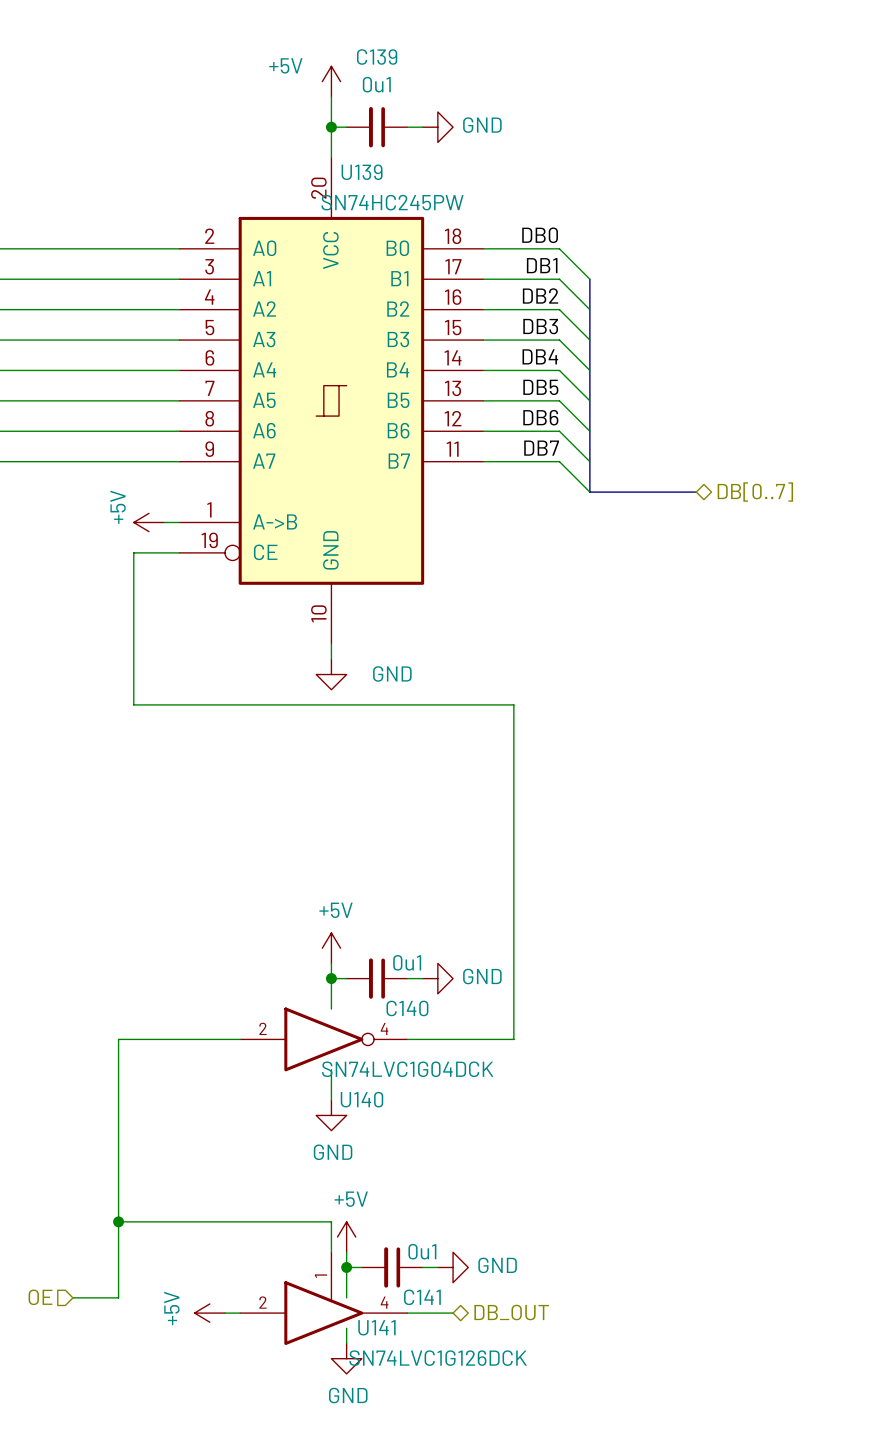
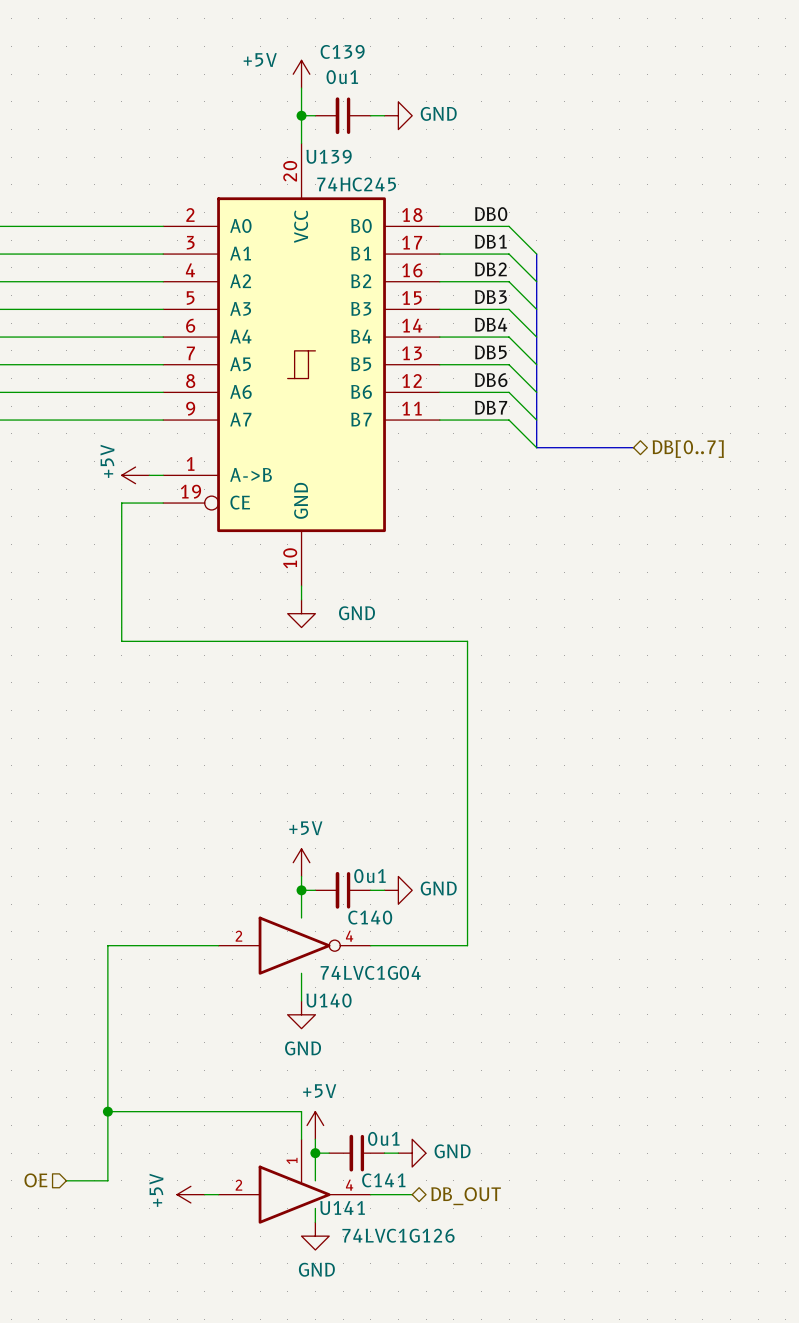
U139 value: SN74HC245PW (392, 202) -> 74HC245 (356, 184)
U140 value: SN74LVC1G04DCK (407, 1069) -> 74LVC1G04 (370, 972)
U141 value: SN74LVC1G126DCK (438, 1358) -> 74LVC1G126 (398, 1235)

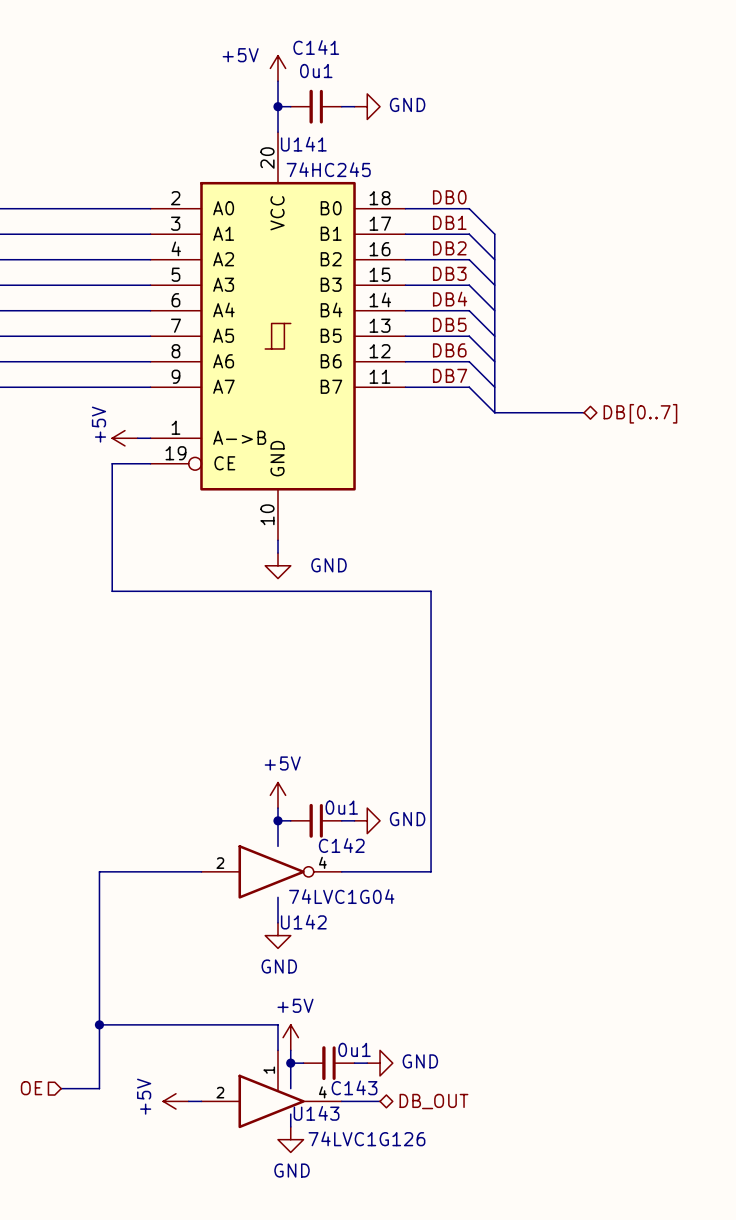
C139 name: C139 (342, 51) -> C141 (316, 47)
U139 name: U139 (329, 156) -> U141 (303, 144)
C140 name: C140 (370, 917) -> C142 (341, 845)
U140 name: U140 (329, 1000) -> U142 (303, 922)
C141 name: C141 (383, 1180) -> C143 (354, 1087)
U141 name: U141 (342, 1208) -> U143 (316, 1113)

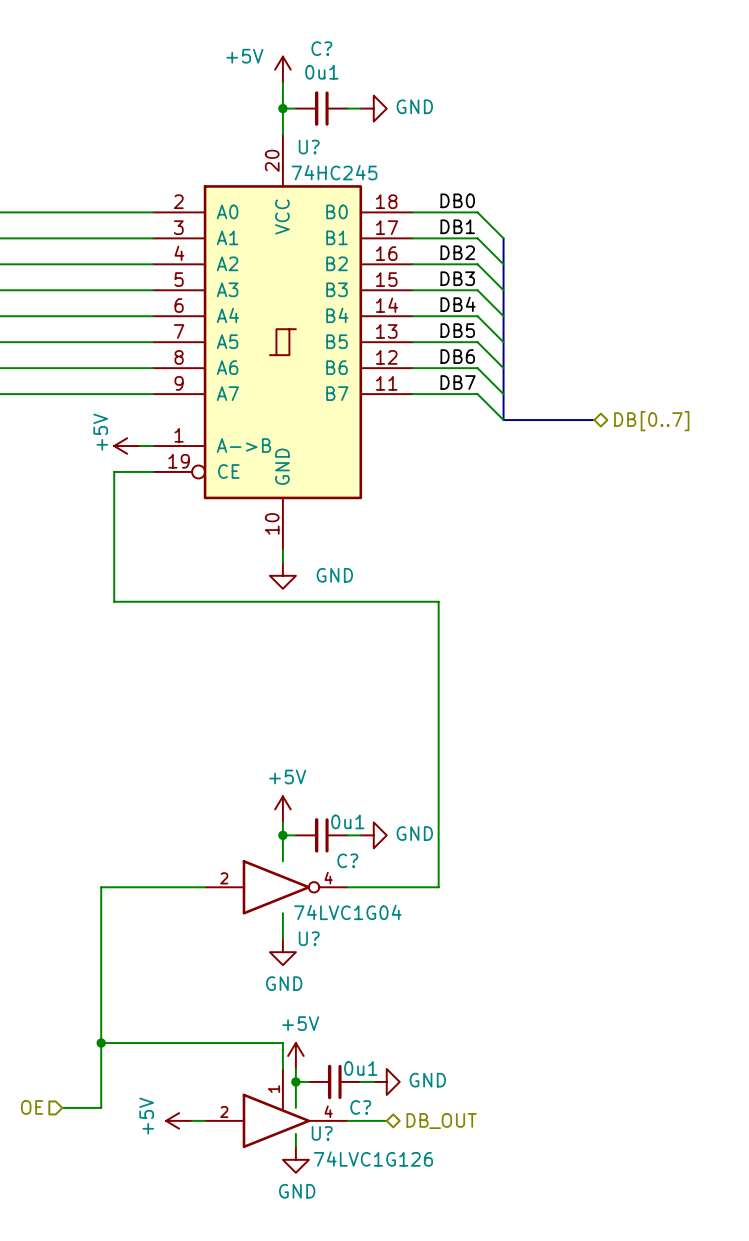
C141 name: C141 (316, 47) -> C? (321, 48)
U141 name: U141 (303, 144) -> U? (309, 147)
C142 name: C142 (341, 845) -> C? (347, 860)
U142 name: U142 (303, 922) -> U? (309, 938)
C143 name: C143 (354, 1087) -> C? (360, 1107)
U143 name: U143 (316, 1113) -> U? (322, 1133)

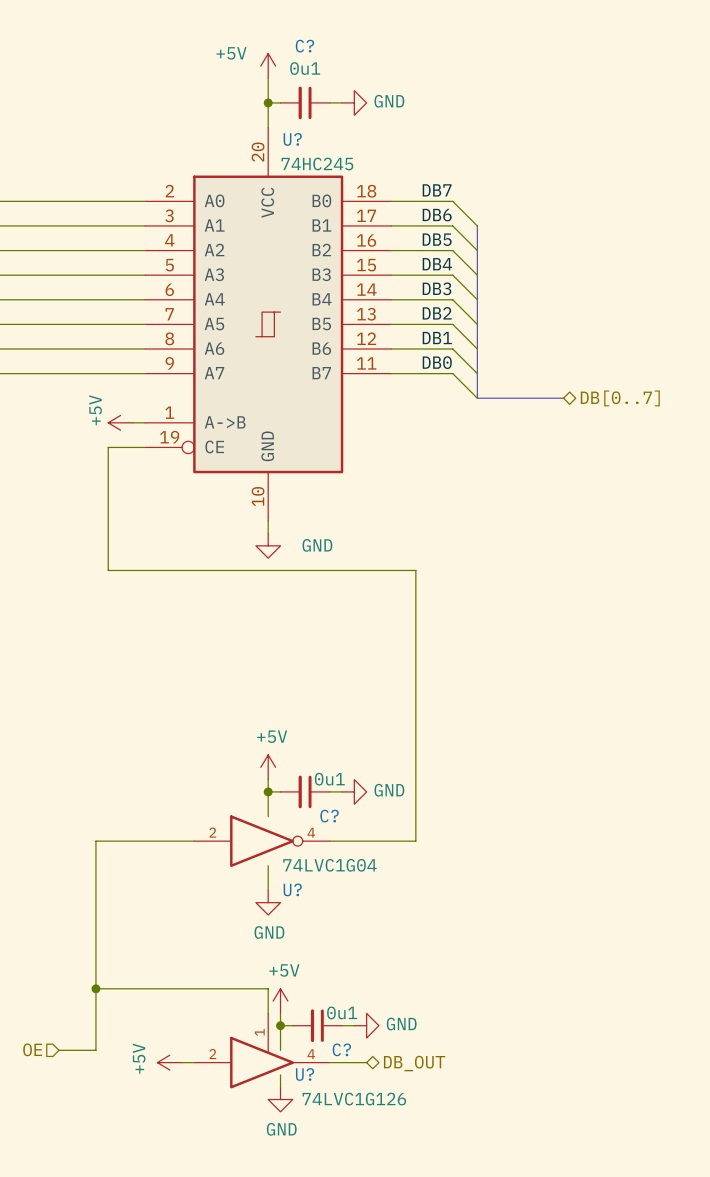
label: DB0 (457, 200) -> DB7 (437, 190)
label: DB1 (457, 226) -> DB6 (437, 215)
label: DB2 (457, 252) -> DB5 (437, 239)
label: DB3 (457, 278) -> DB4 (437, 264)
label: DB4 (458, 304) -> DB3 (437, 288)
label: DB5 (457, 330) -> DB2 (437, 313)
label: DB6 (457, 356) -> DB1 (437, 338)
label: DB7 (458, 382) -> DB0 (437, 362)

